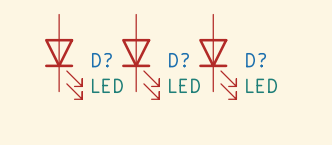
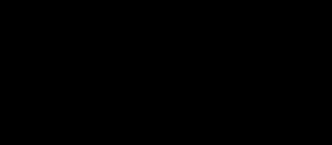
D?: LED (63, 56) -> none
D?: LED (140, 56) -> none
D?: LED (217, 56) -> none

